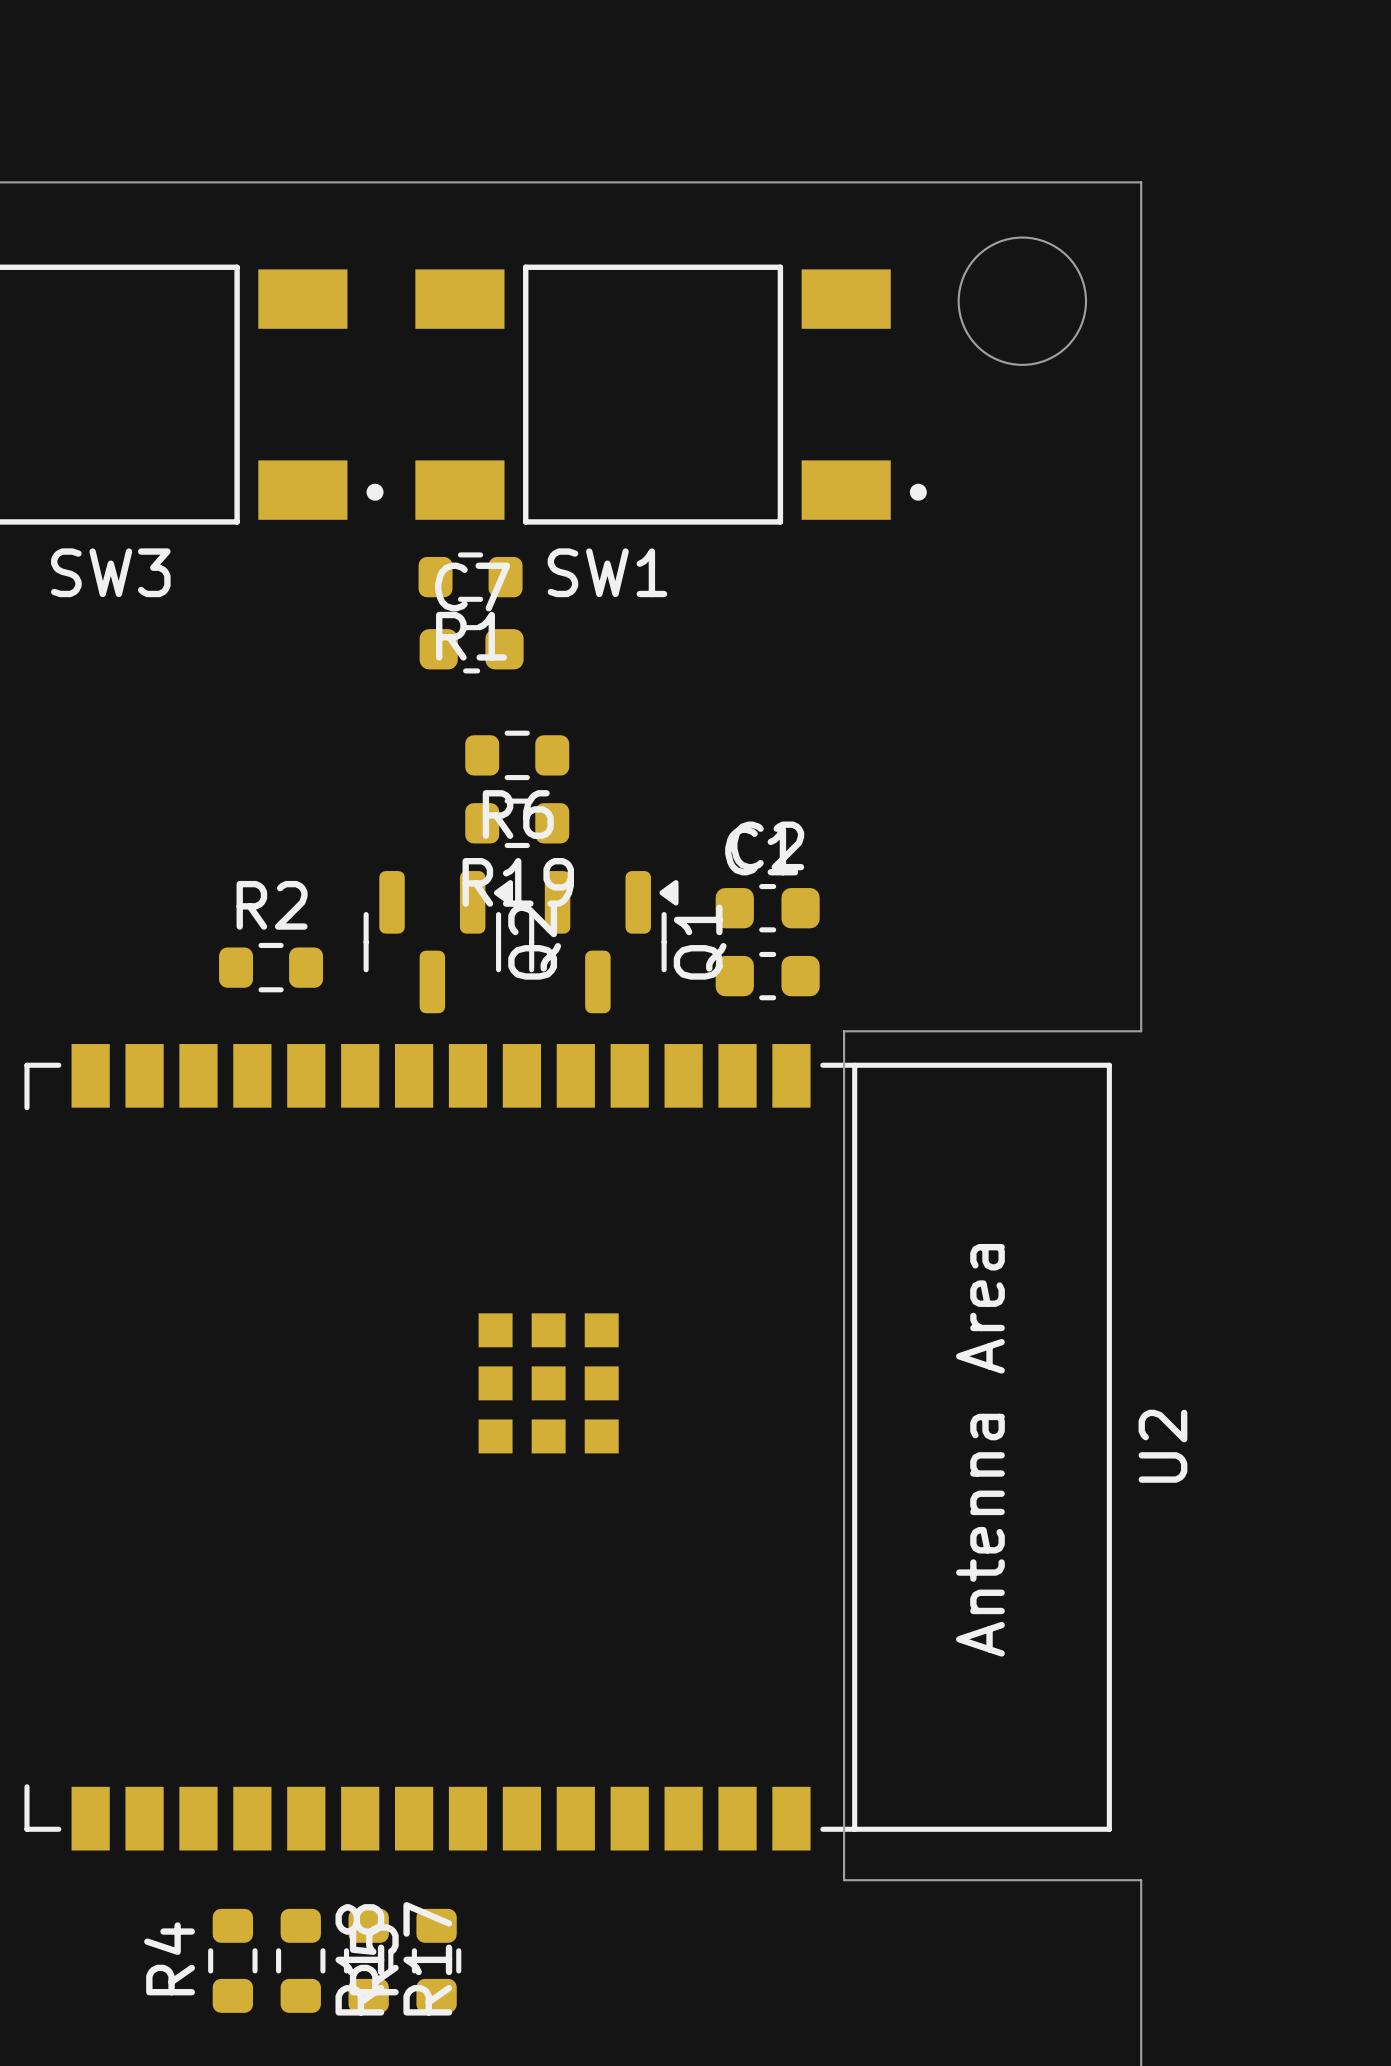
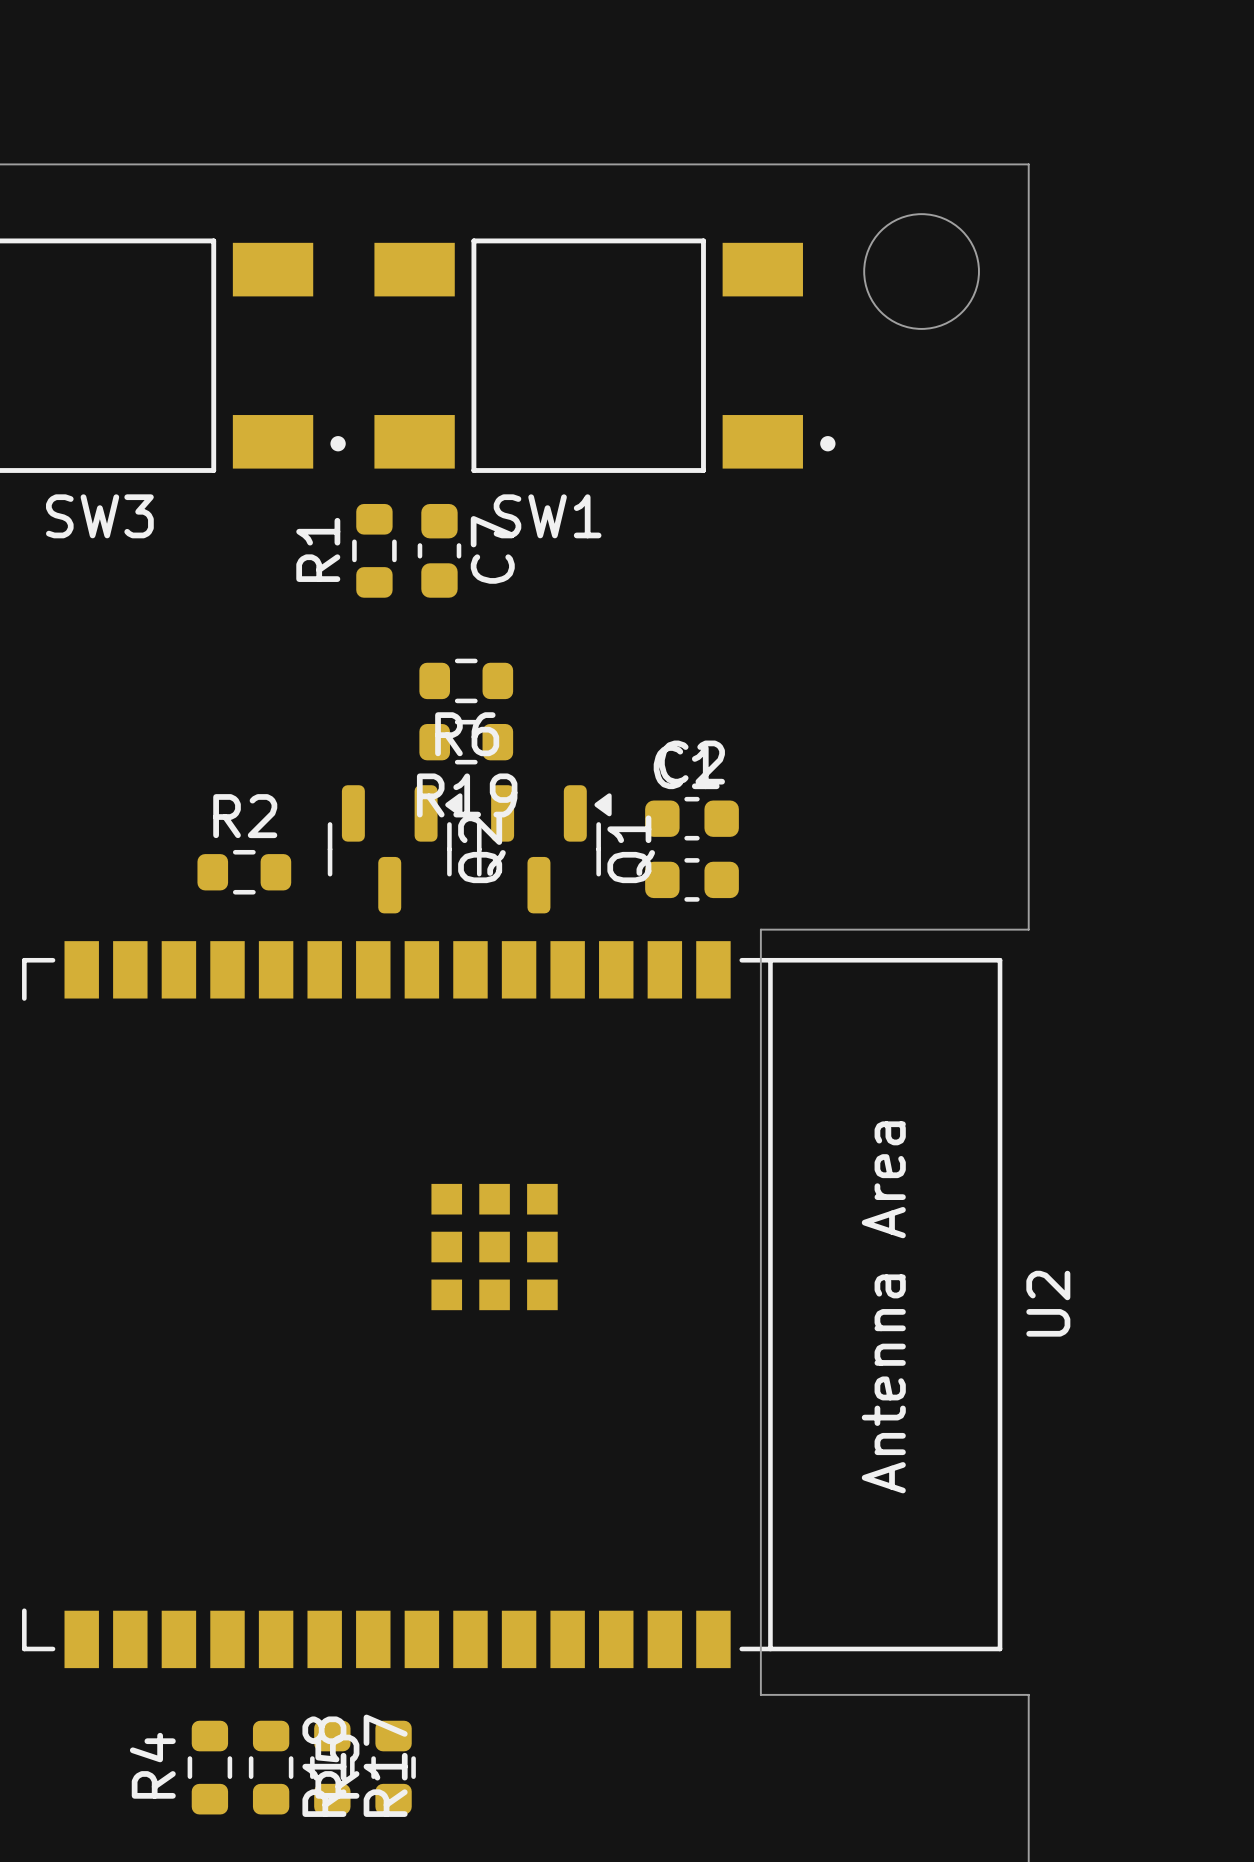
R1 rotation: 0° (470, 577) -> 90° clockwise (374, 550)
R1 position: (470, 577) -> (374, 550)
C7 rotation: 0° (471, 649) -> 90° clockwise (439, 550)

